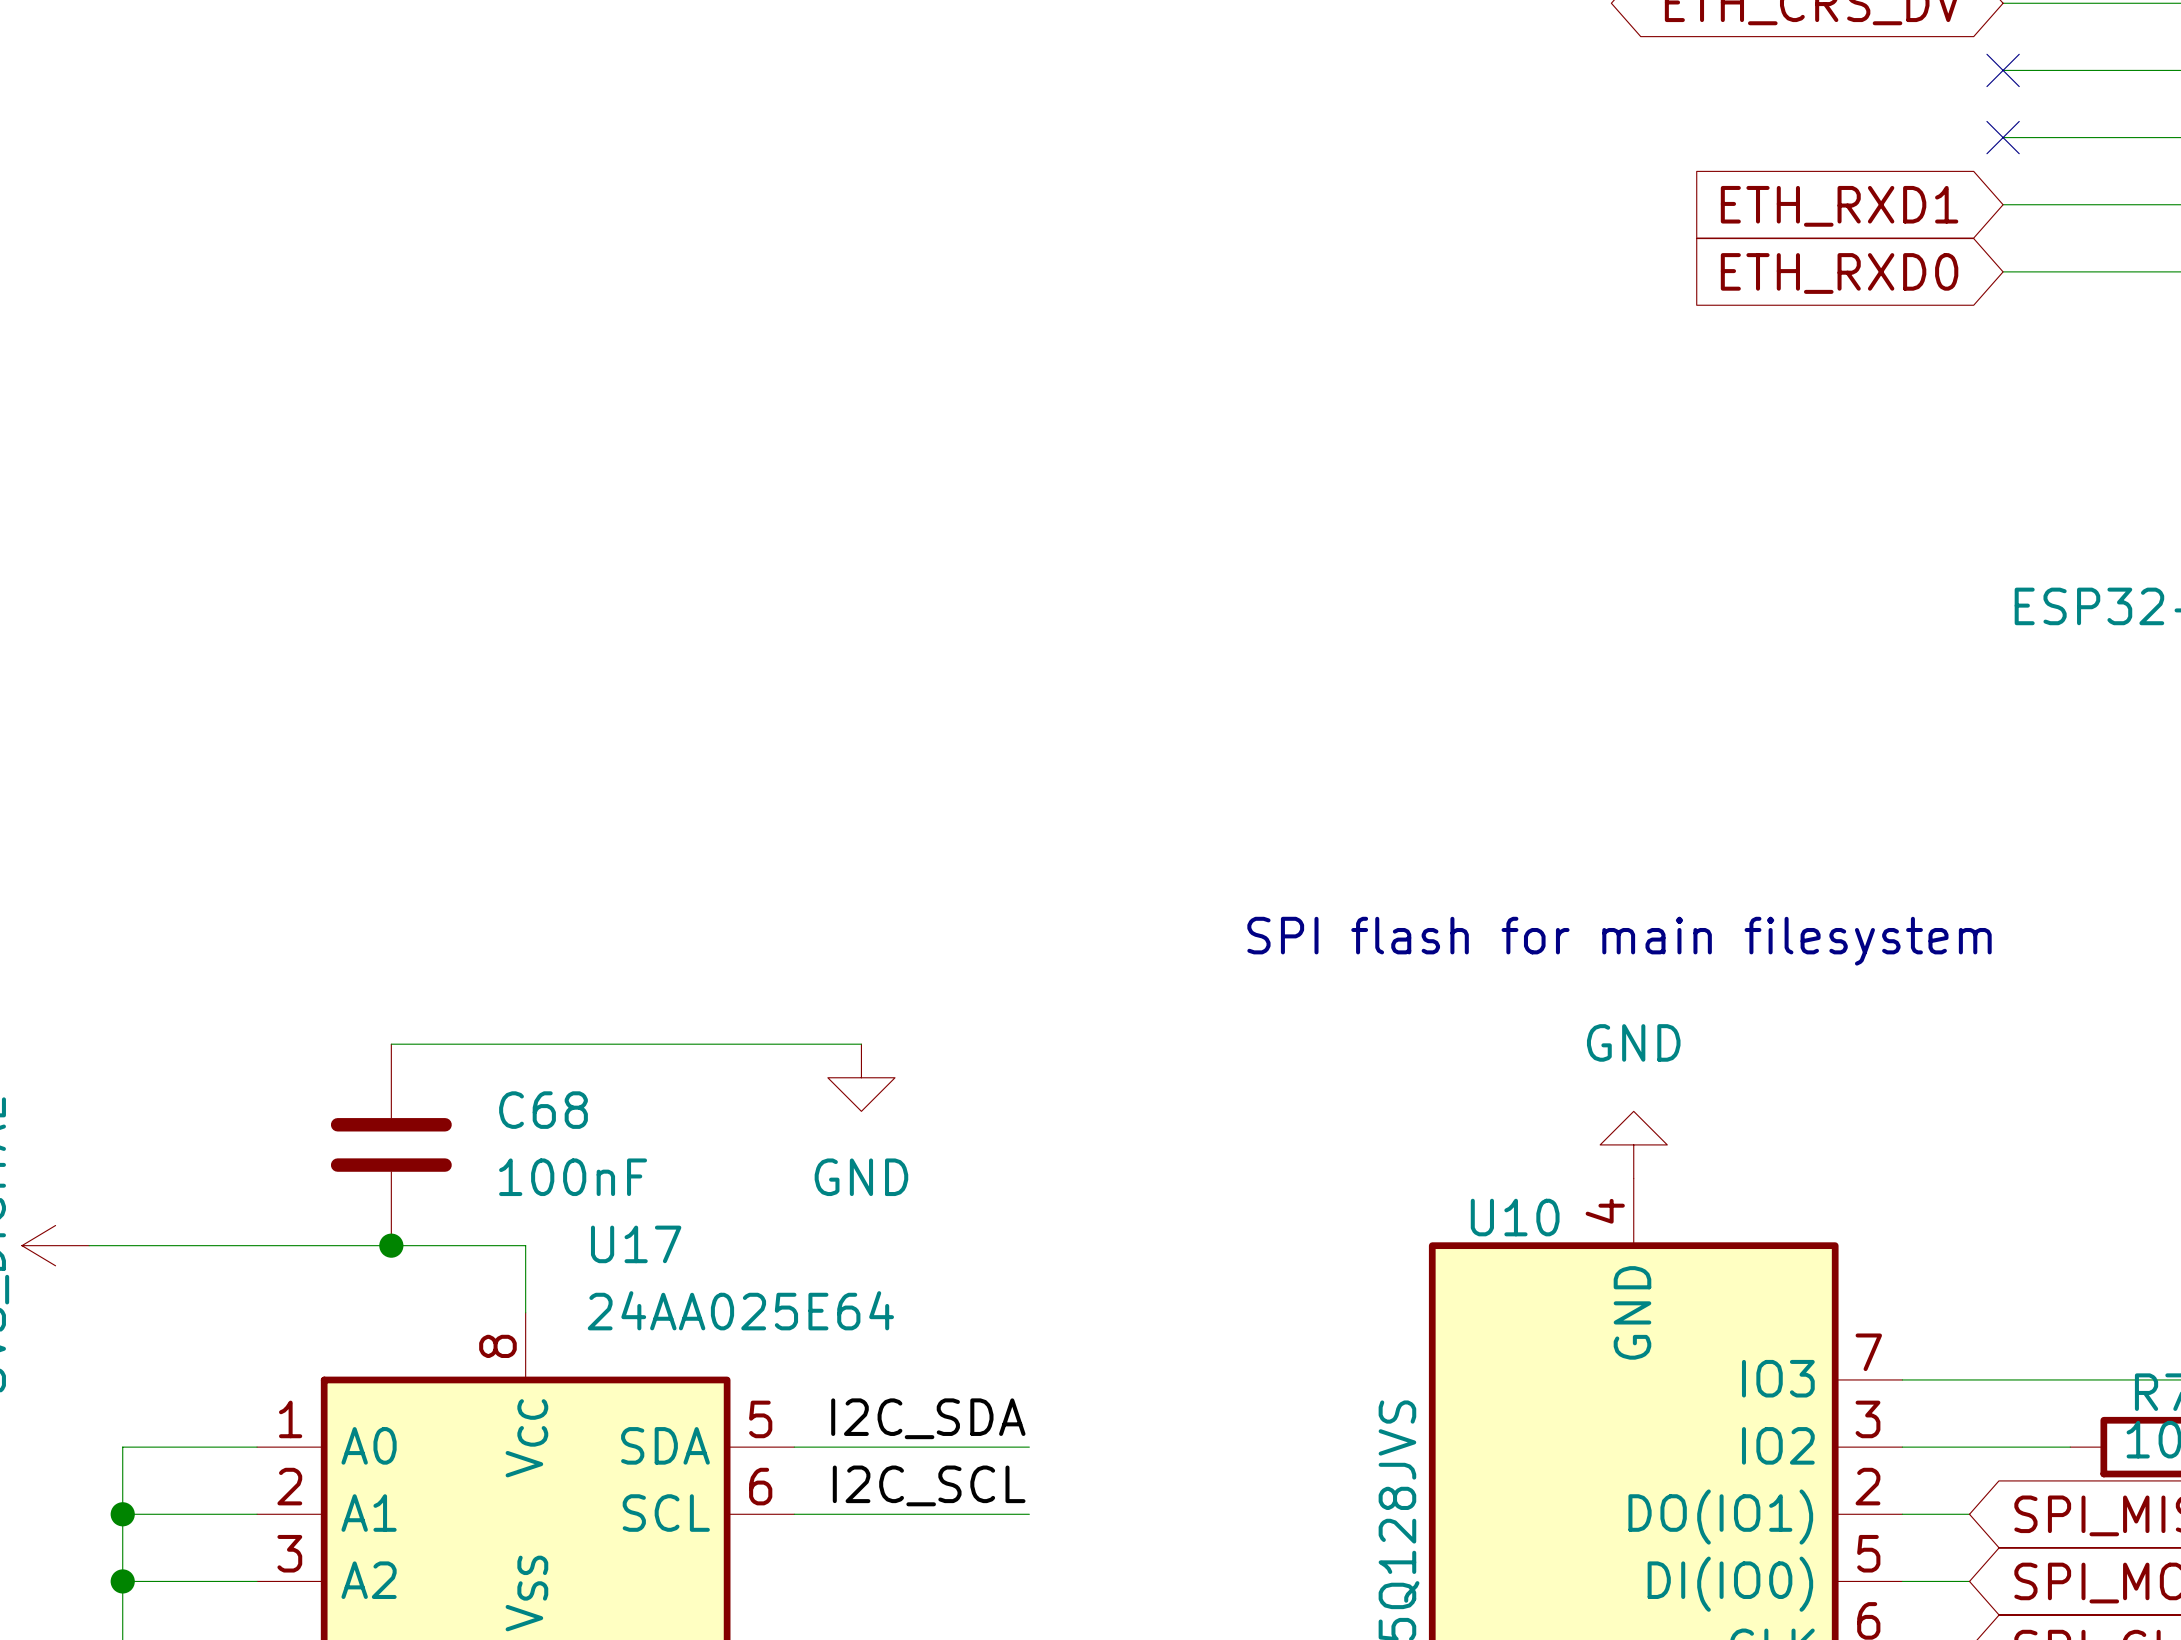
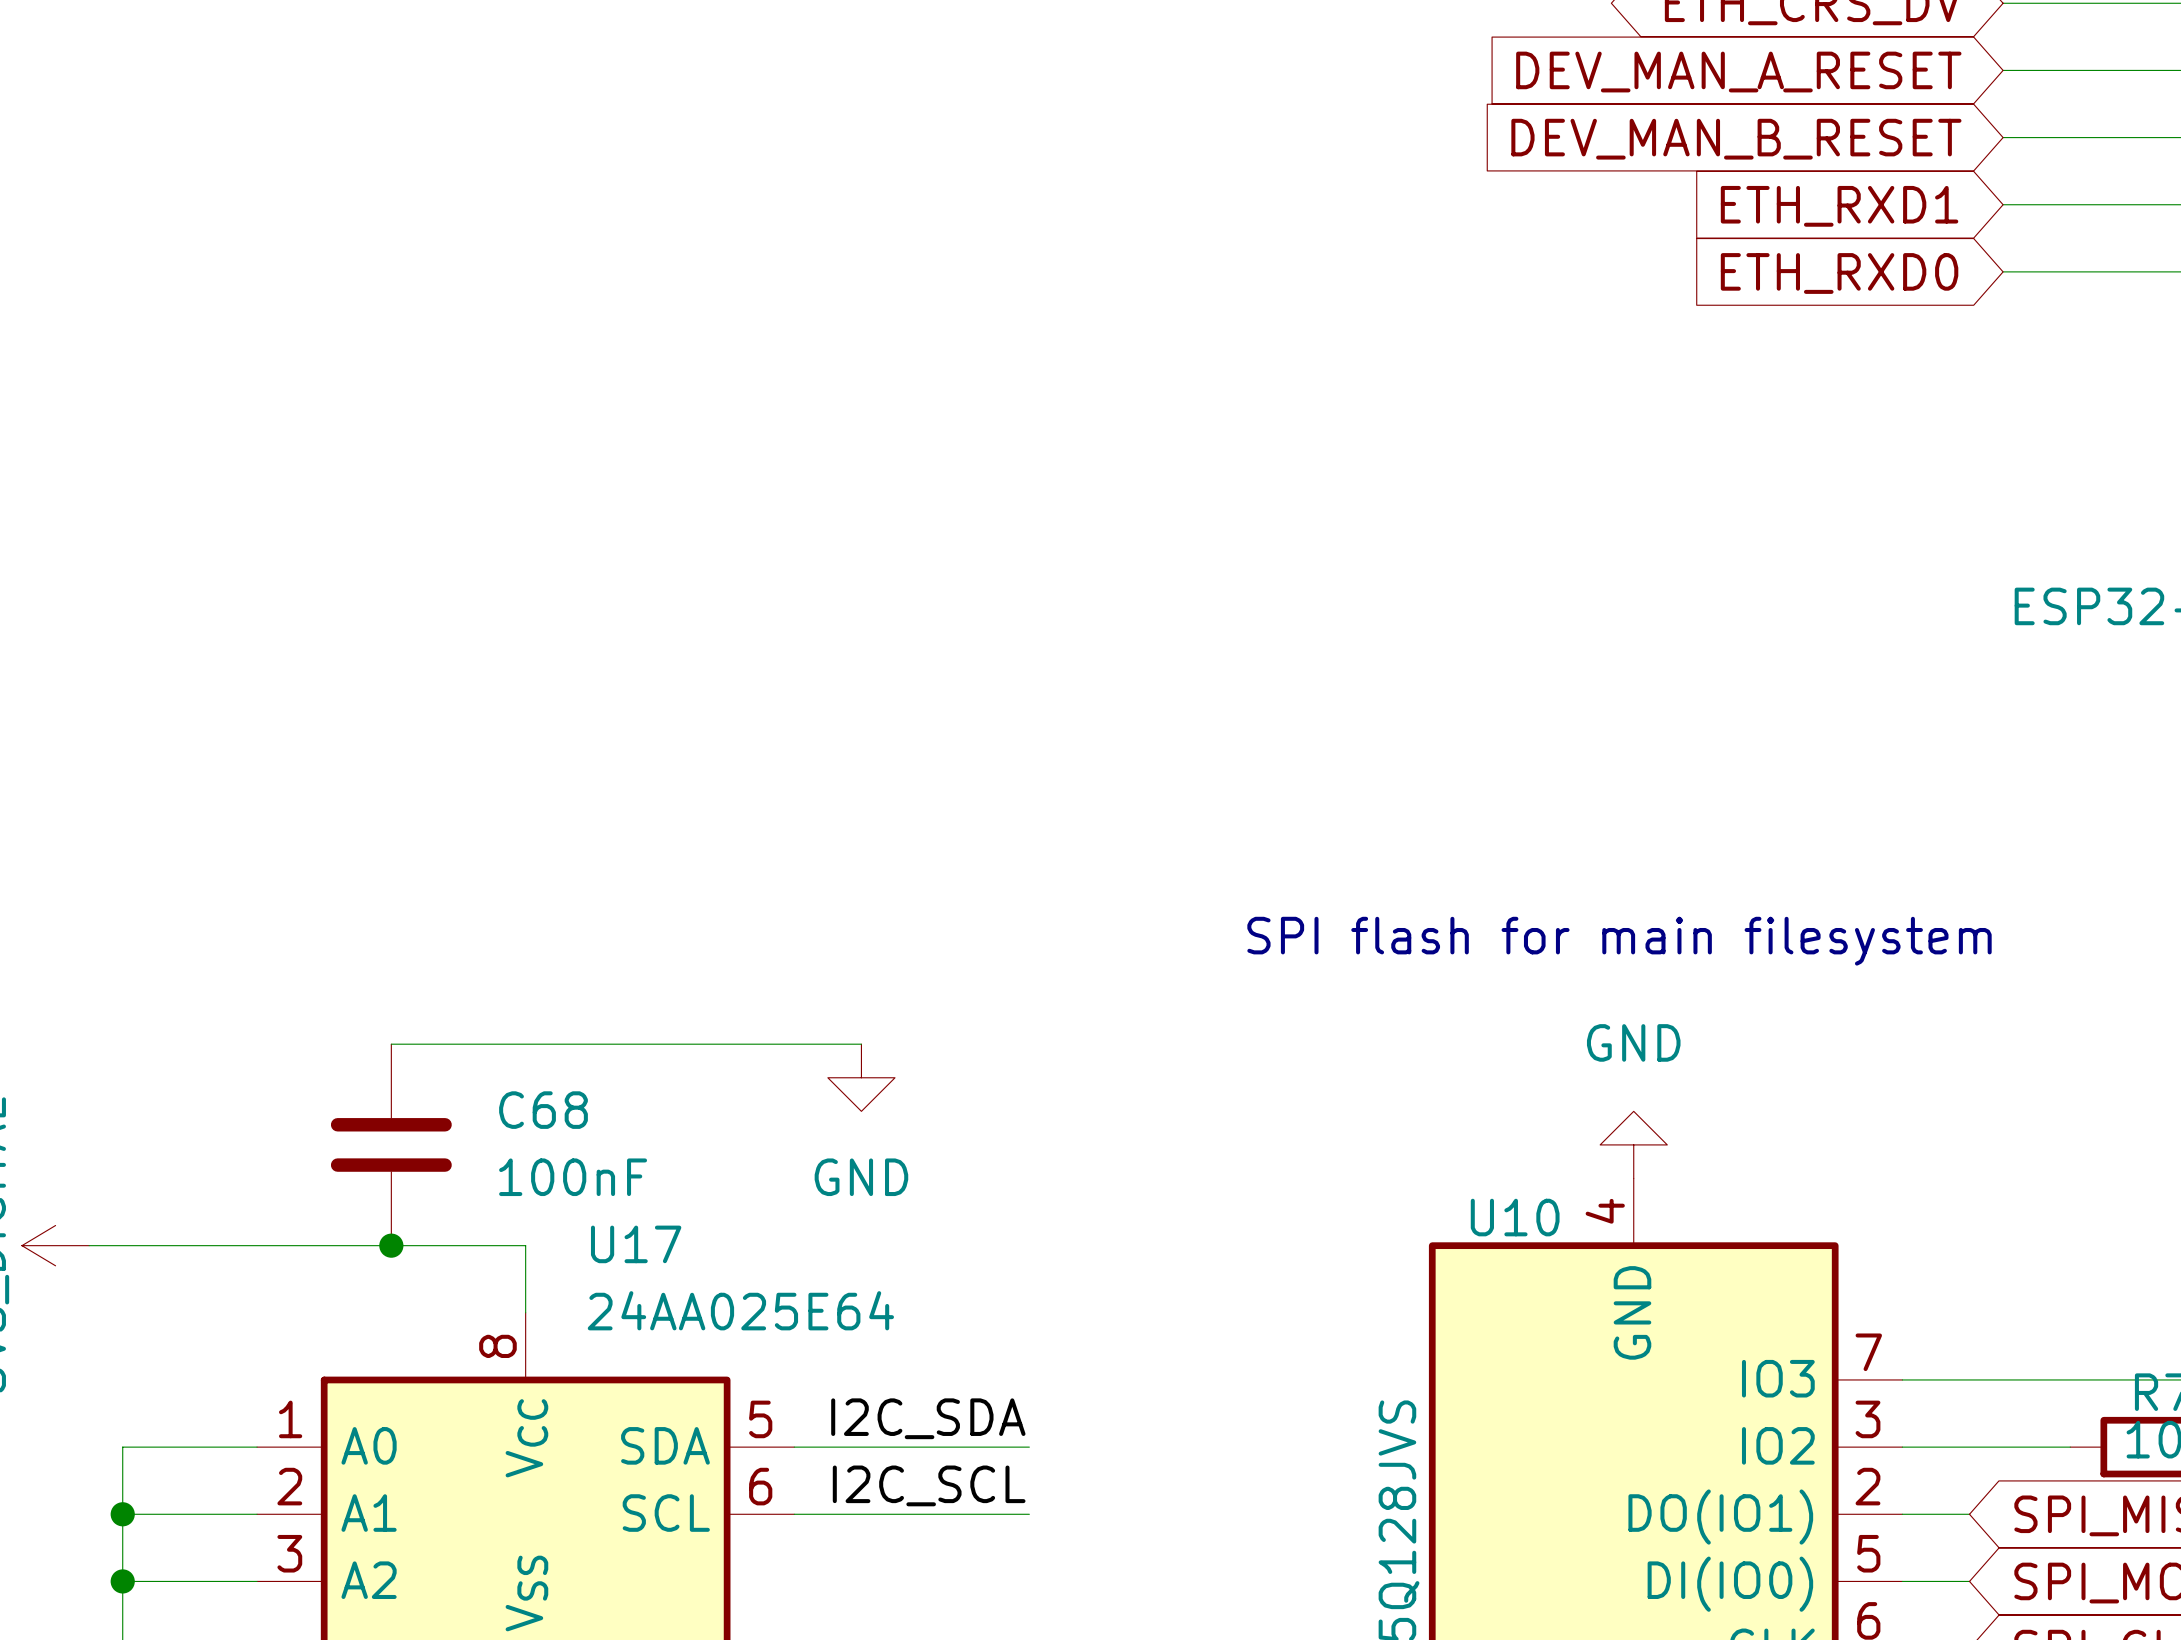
no-connect mark: (2003, 70) -> none
global label: none -> DEV_MAN_A_RESET (1738, 72)
no-connect mark: (2003, 137) -> none
global label: none -> DEV_MAN_B_RESET (1736, 139)

